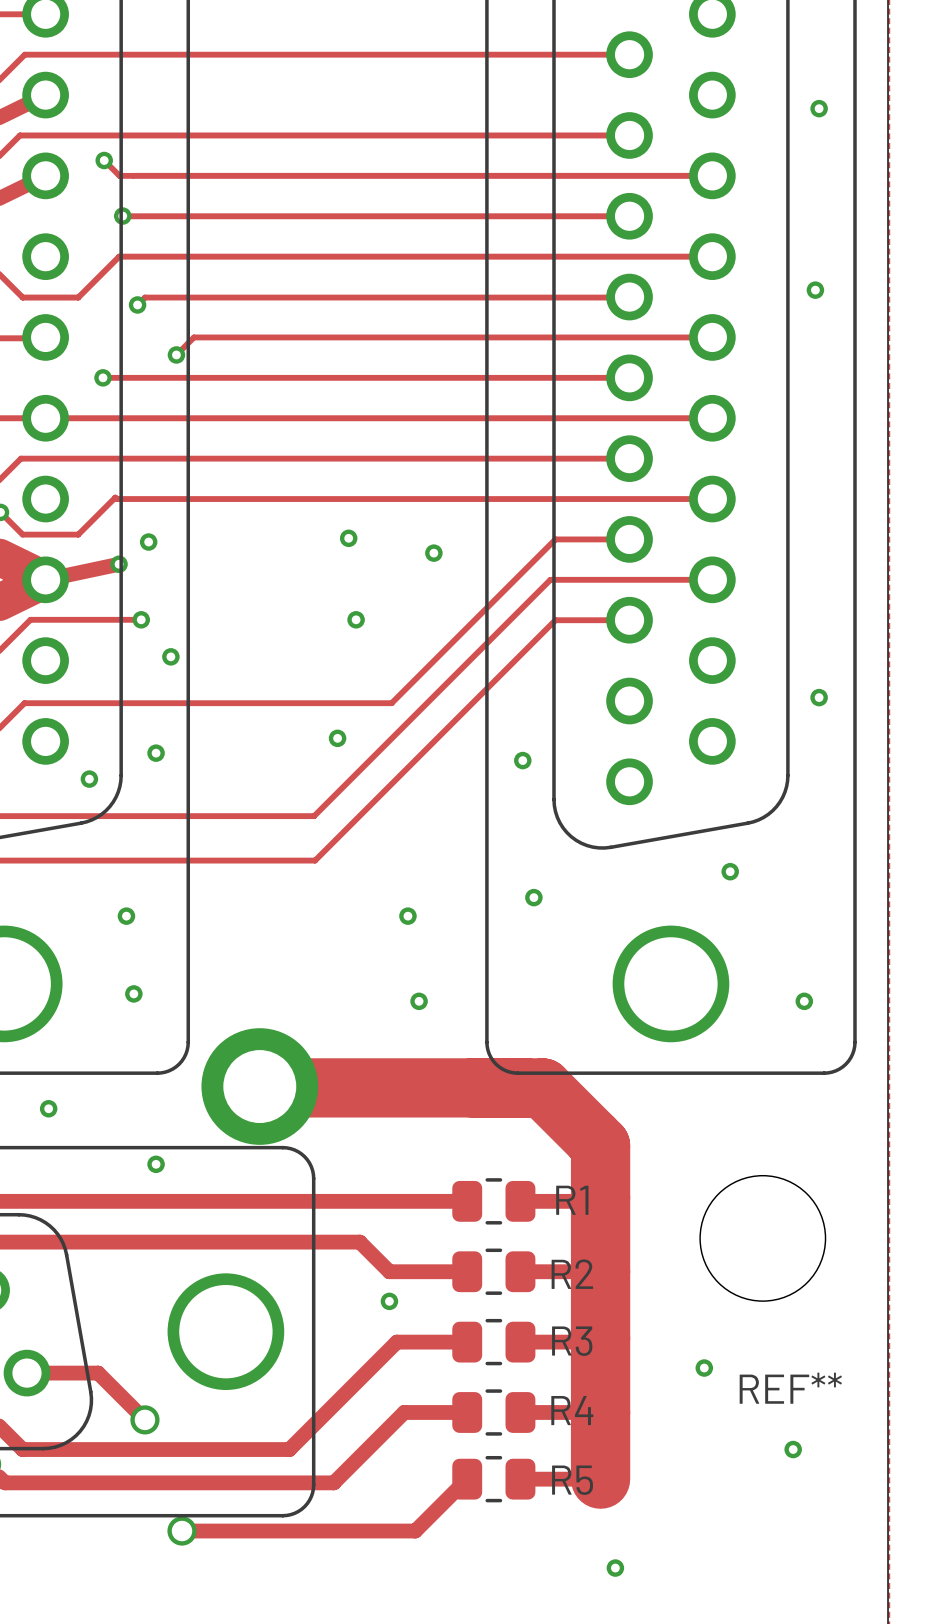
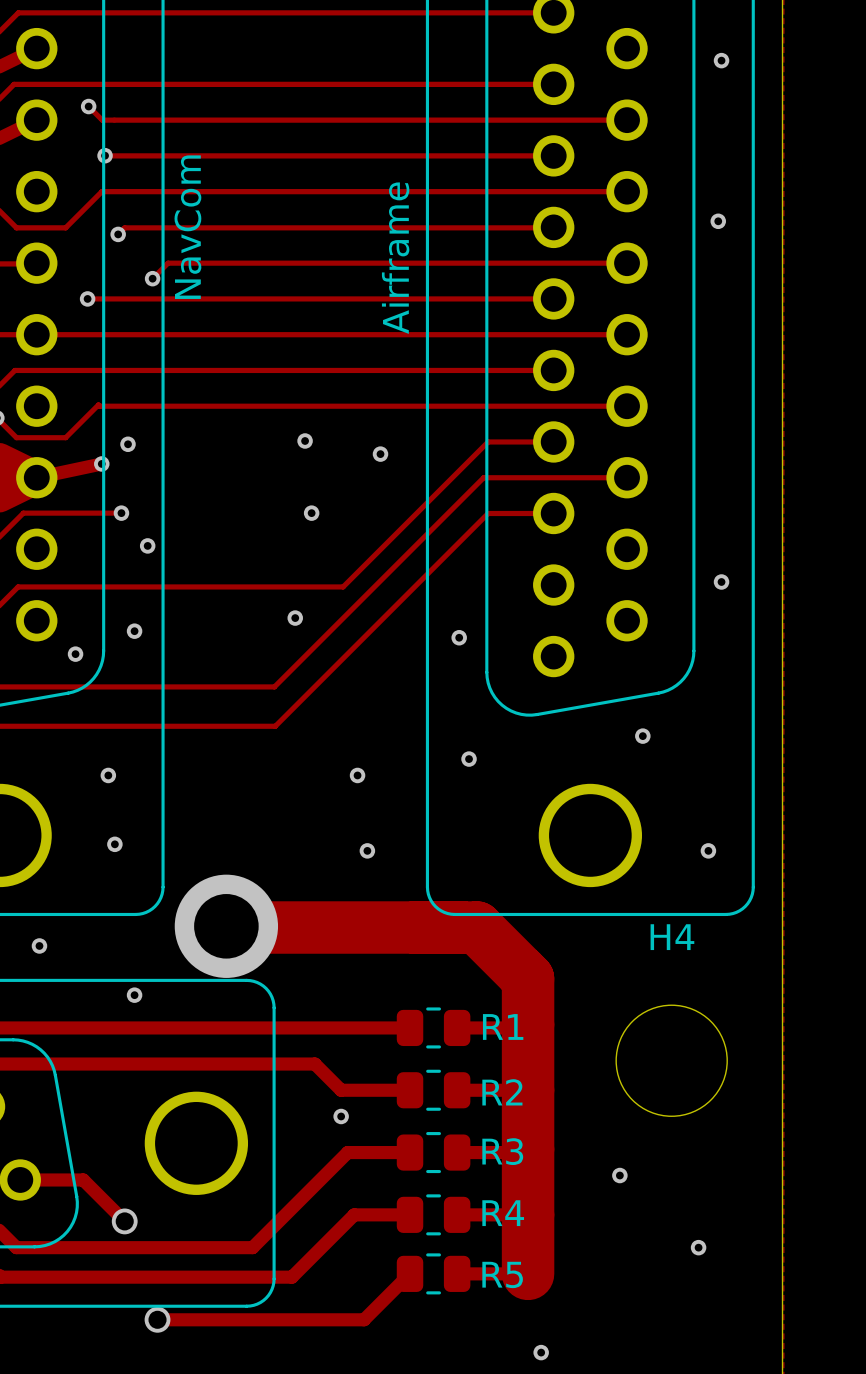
part value: none -> NavCom (187, 227)
part value: none -> Airframe (395, 258)
REF** name: REF** (790, 1388) -> H4 (672, 937)

